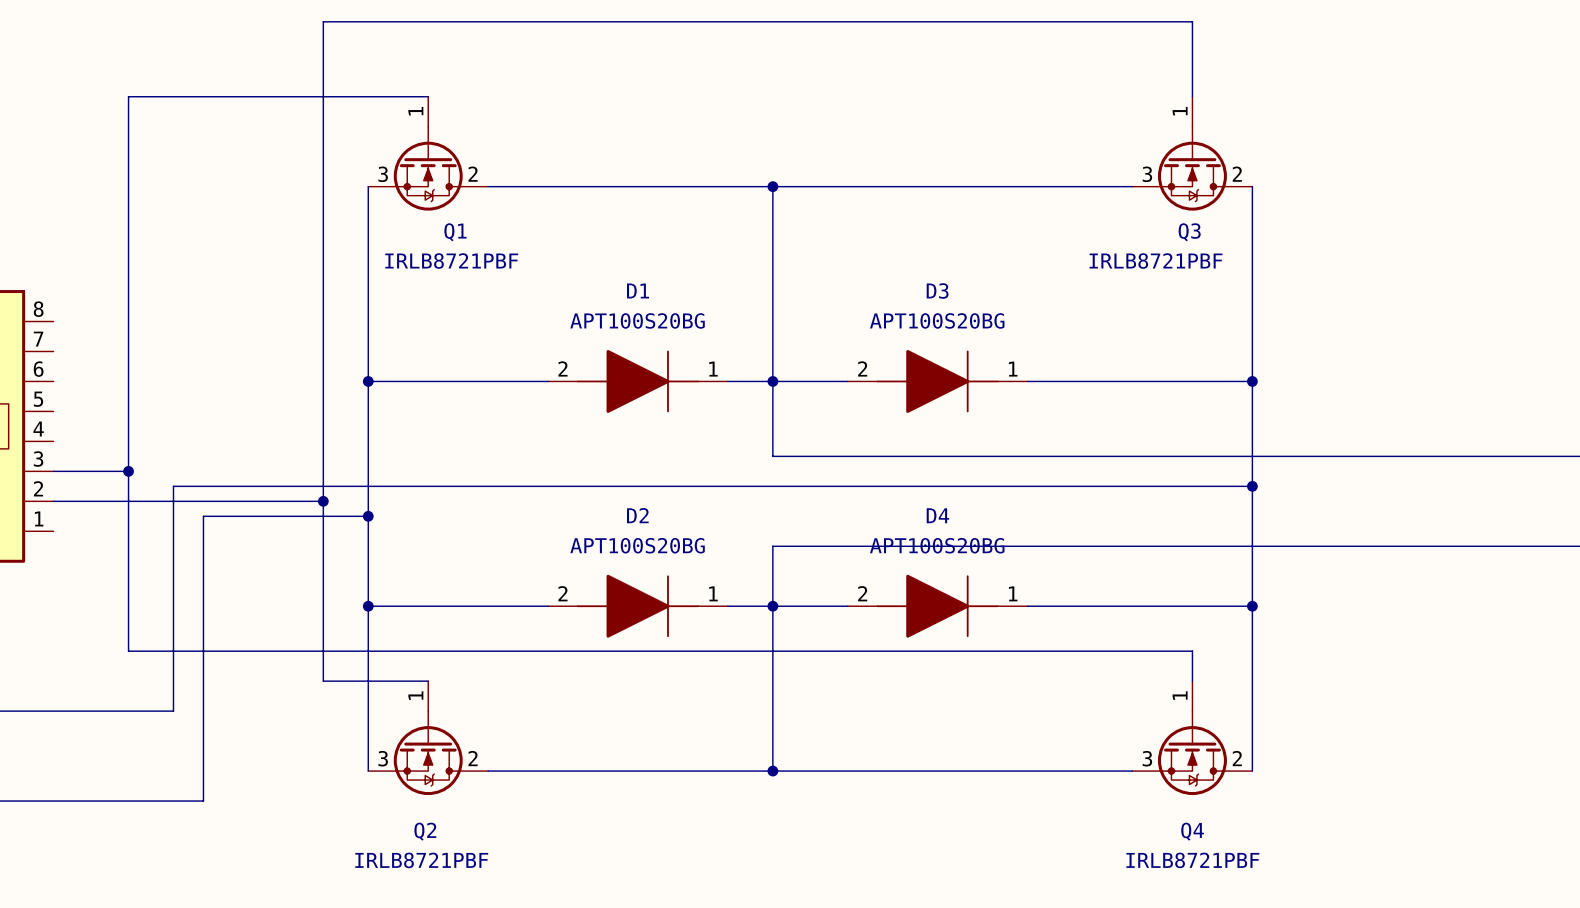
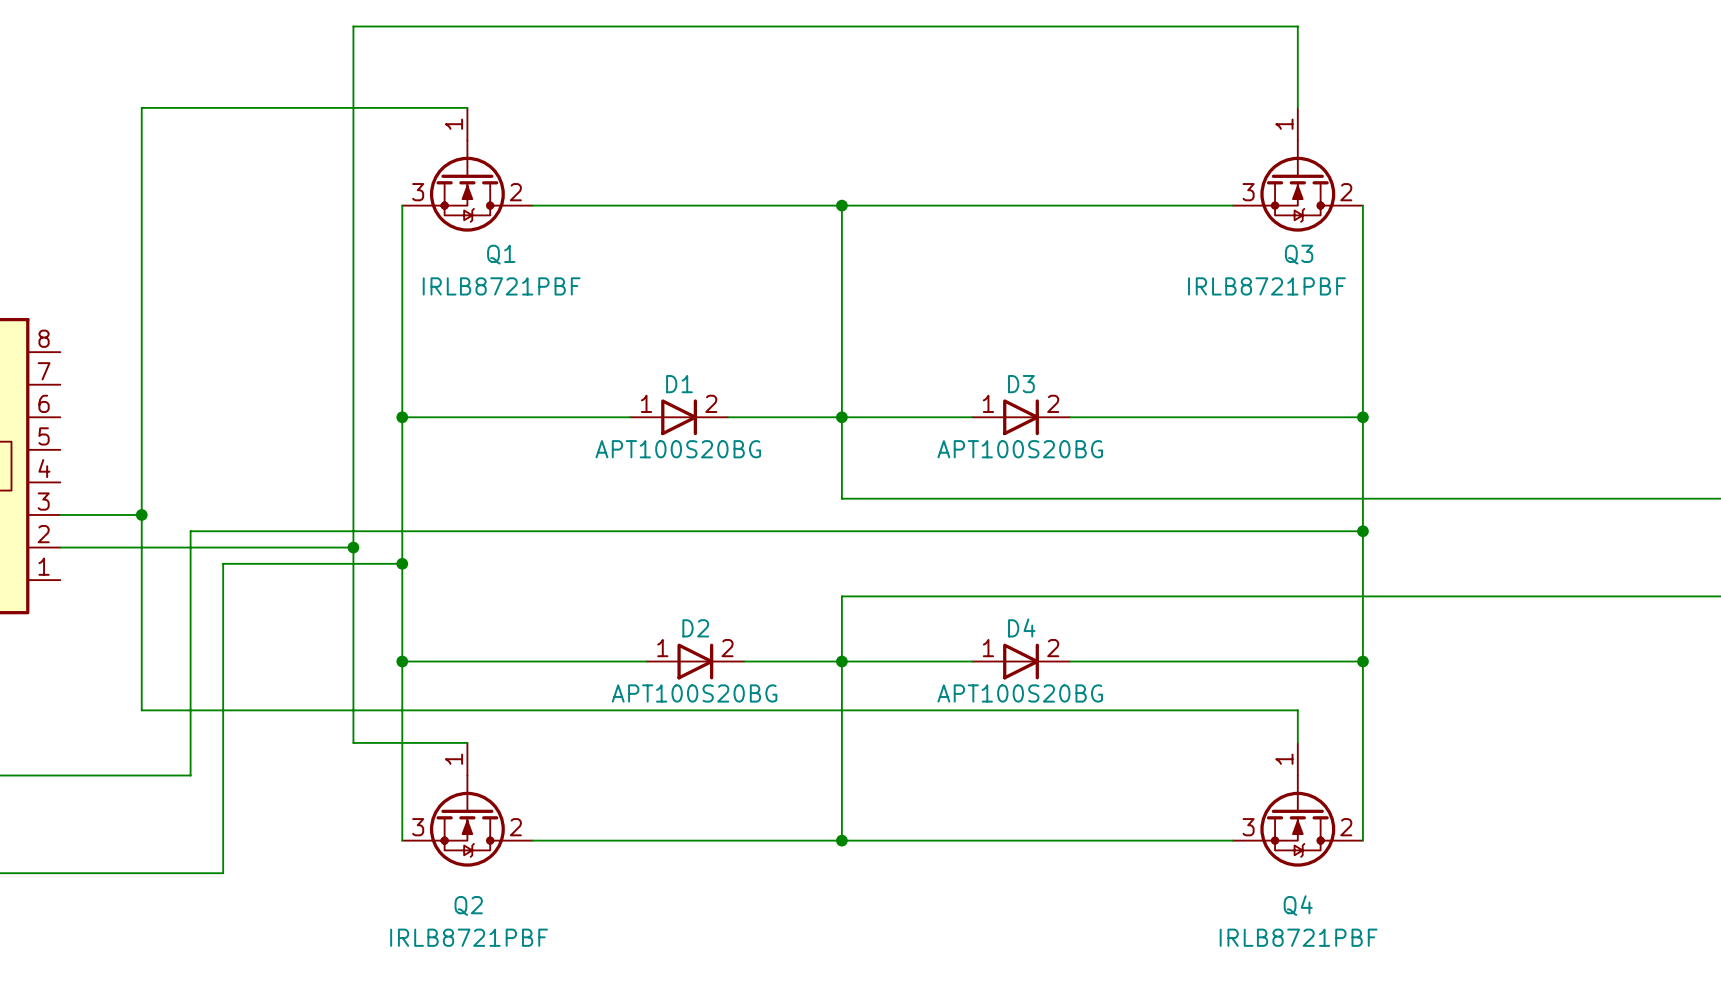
D1 name position: D1 (638, 290) -> D1 (679, 384)
D3 name position: D3 (937, 290) -> D3 (1021, 384)
D1 value position: APT100S20BG (637, 320) -> APT100S20BG (678, 449)
D3 value position: APT100S20BG (937, 320) -> APT100S20BG (1020, 449)
D1 symbol: [548, 349, 728, 413] -> [630, 399, 728, 436]
D3 symbol: [847, 349, 1028, 413] -> [972, 399, 1070, 436]
D2 name position: D2 (637, 515) -> D2 (695, 628)
D4 name position: D4 (937, 515) -> D4 (1021, 627)
D2 value position: APT100S20BG (637, 545) -> APT100S20BG (694, 693)
D4 value position: APT100S20BG (937, 545) -> APT100S20BG (1020, 693)
D2 symbol: [548, 574, 728, 638] -> [646, 643, 745, 680]
D4 symbol: [847, 574, 1028, 638] -> [972, 643, 1070, 680]

